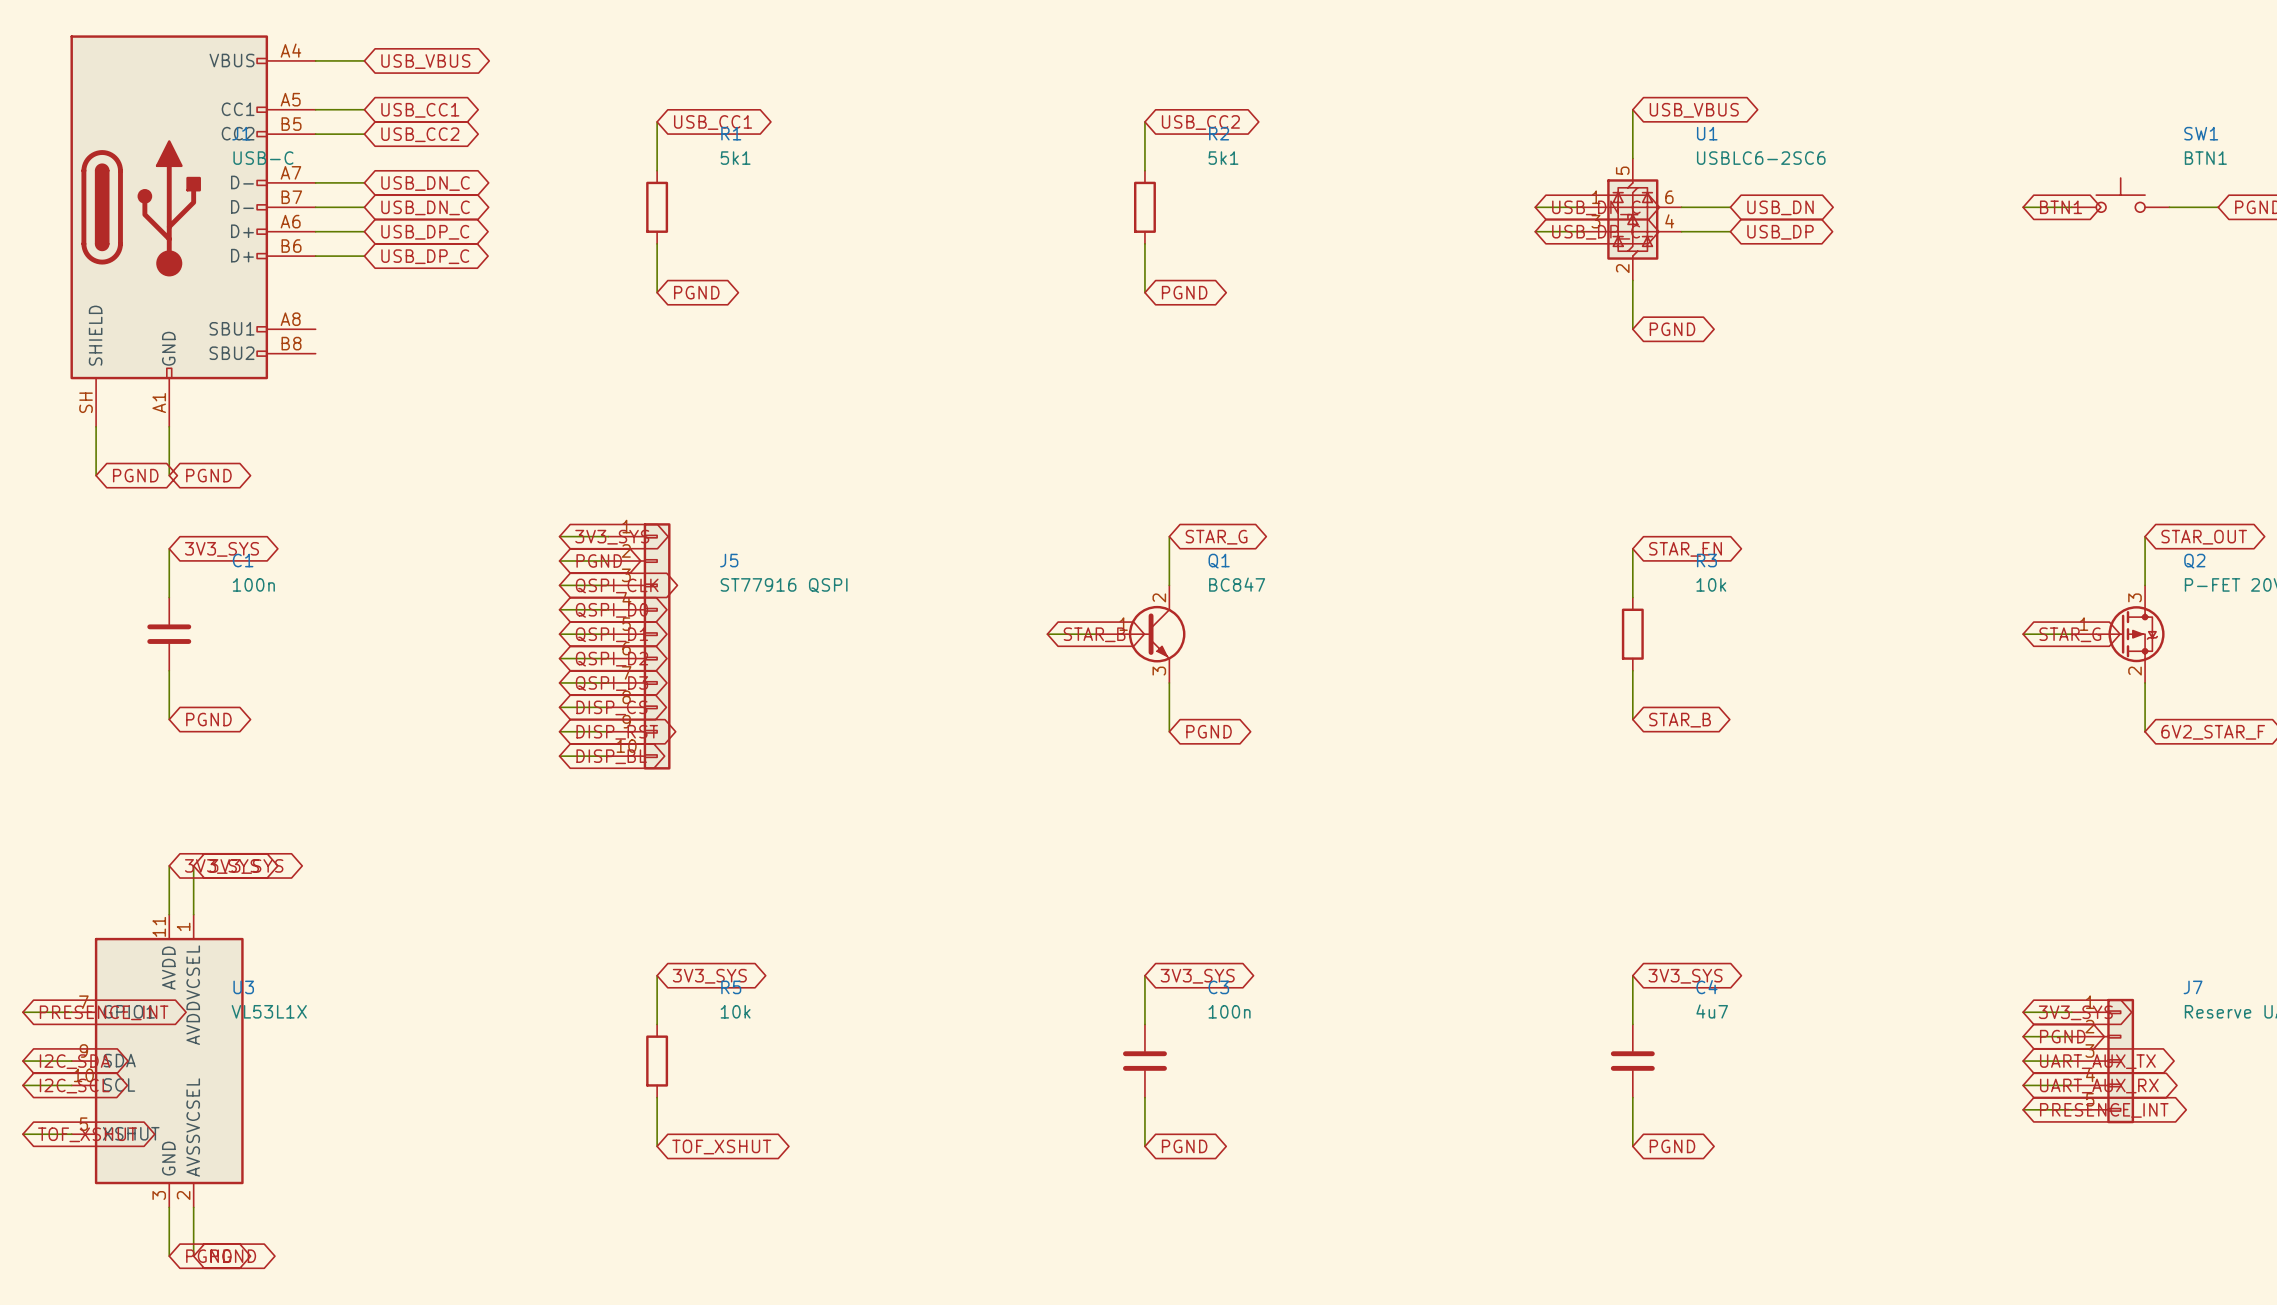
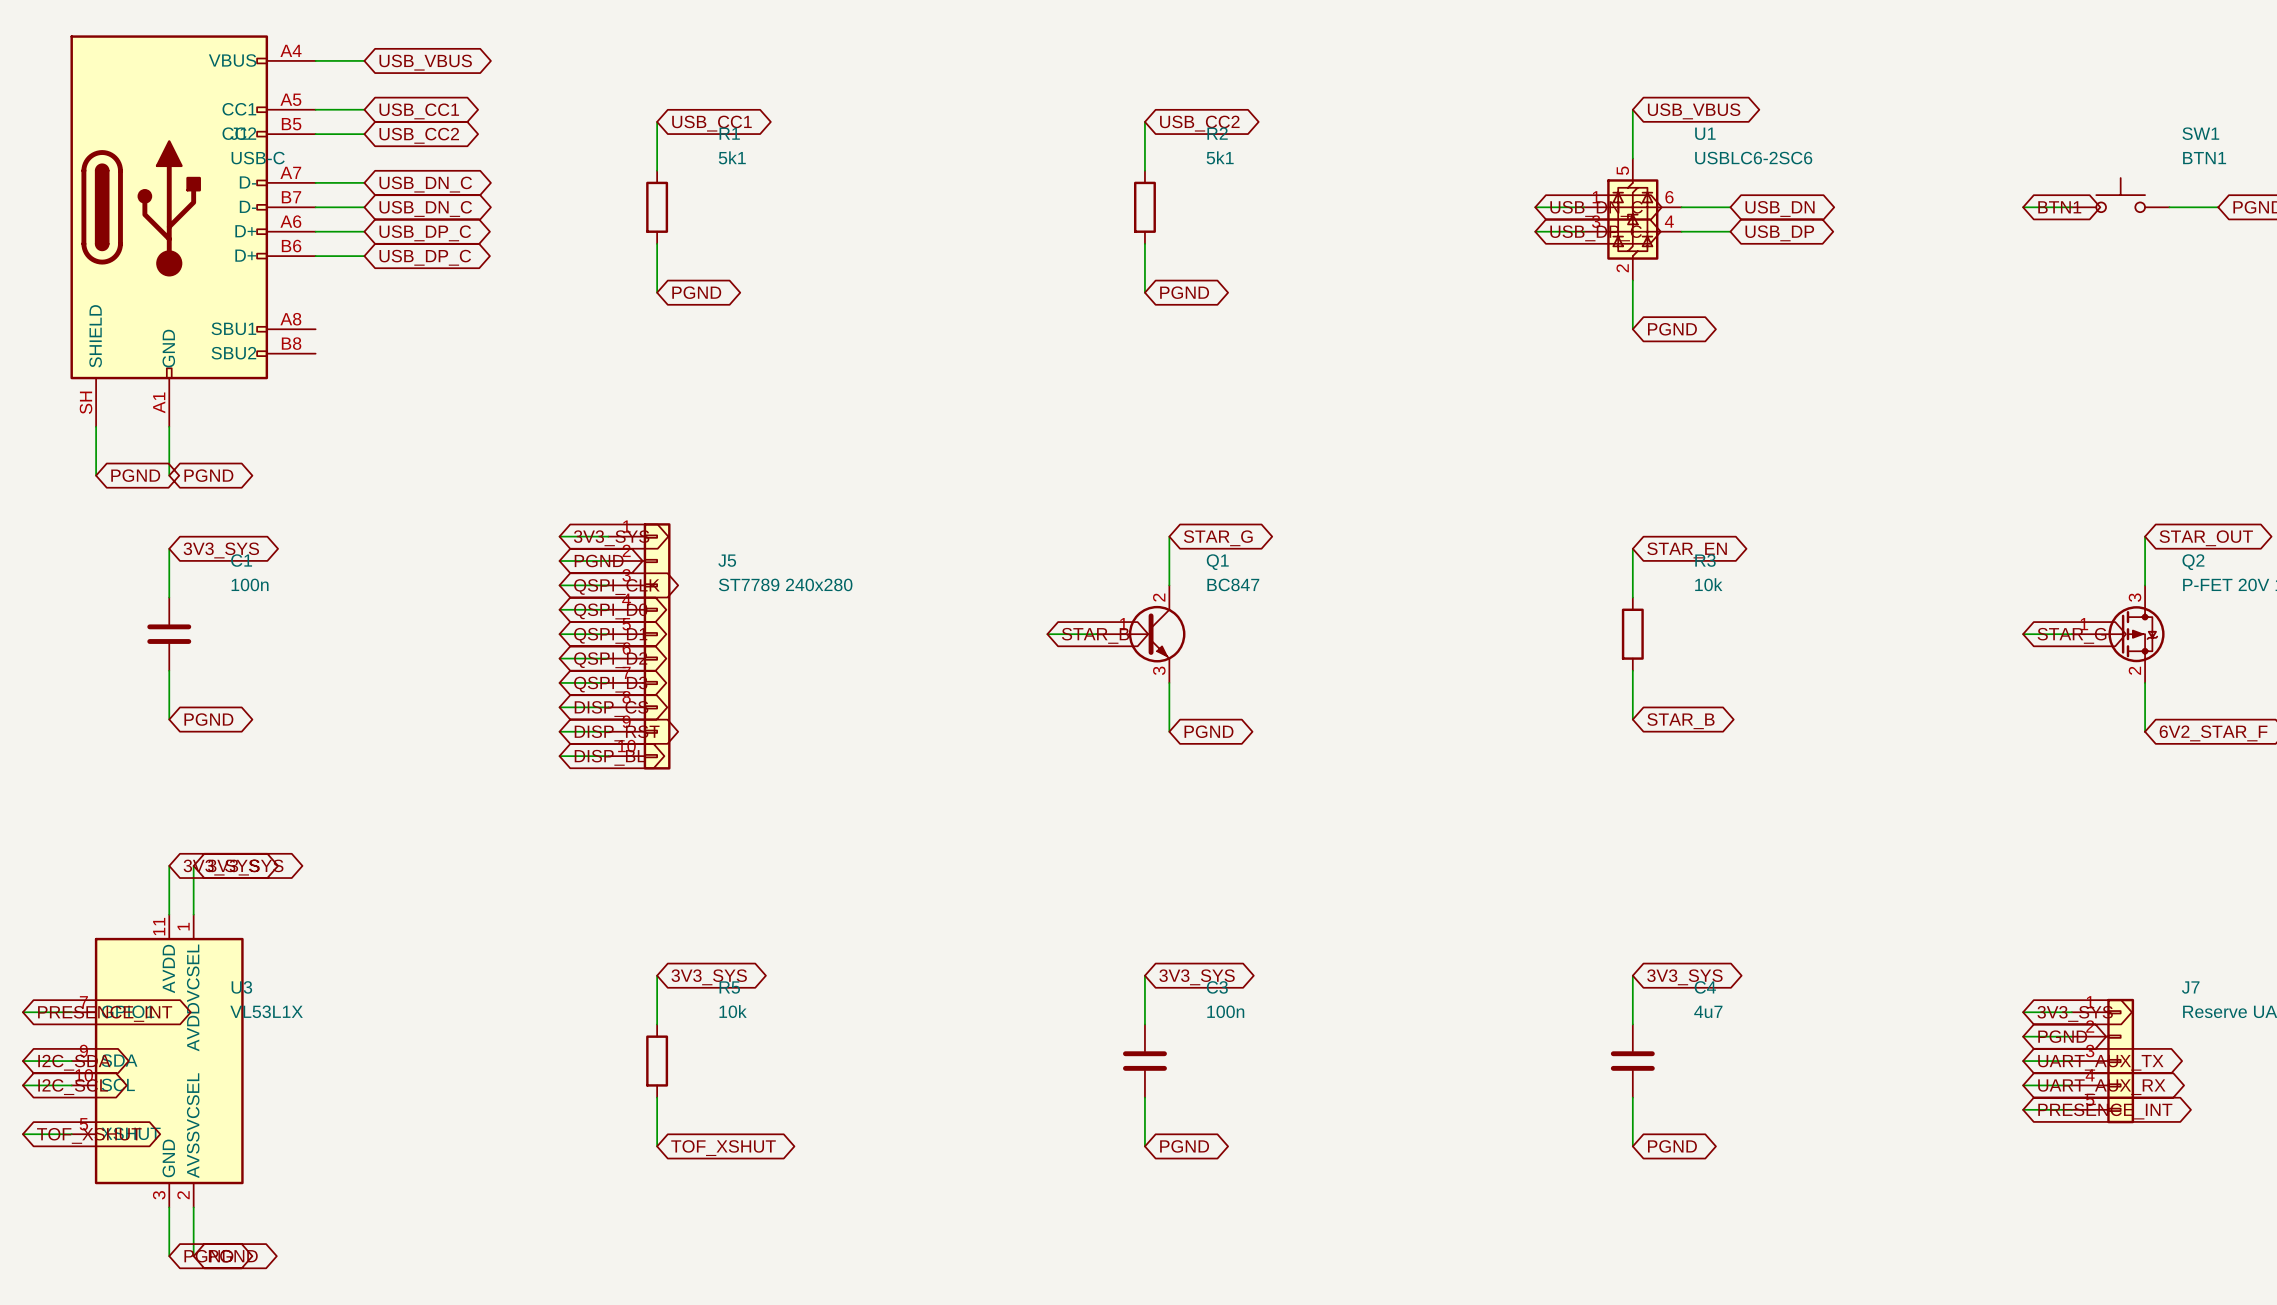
J5 value: ST77916 QSPI (784, 585) -> ST7789 240x280 (785, 584)

